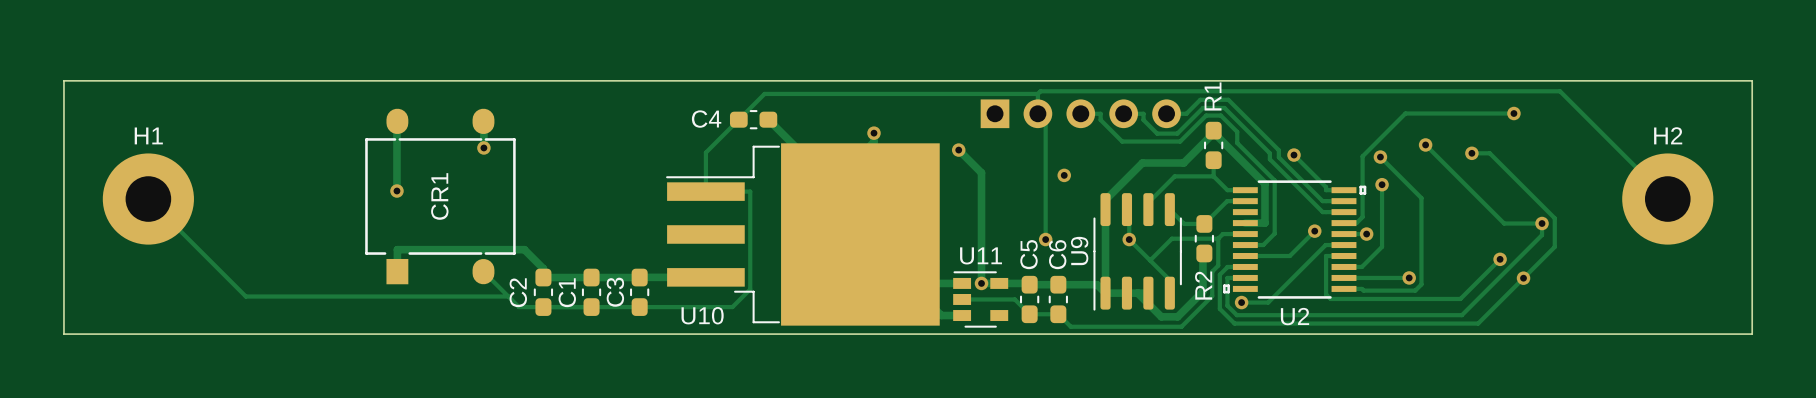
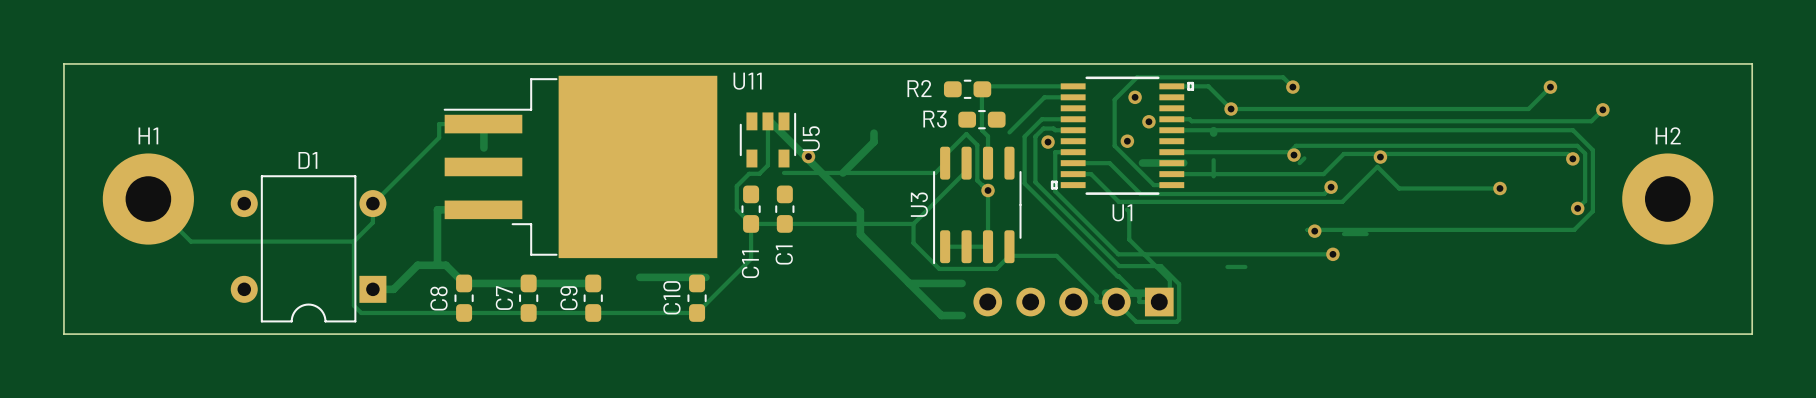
board edge: (63, 80) (1752, 80) -> (63, 80) (63, 63) (1752, 63) (1752, 80)
track: none -> (1073, 86) (985, 86) (981, 89) (981, 130) (988, 136) (988, 163)
track: none -> (1171, 86) (1208, 86) (1231, 109) (1528, 109) (1550, 87)
track: none -> (1292, 87) (1283, 77) (1137, 77) (1114, 99) (1114, 145) (1153, 185) (1171, 185)
via: none -> (1292, 87)
via: none -> (1550, 87)
track: (1037, 93) (1040, 91) (1560, 91) (1667, 199) -> none
track: (1037, 93) (764, 93) (705, 152) (705, 191) (750, 191) (750, 289) (732, 307) (518, 307) (483, 271) -> none
track: (1037, 93) (1037, 113) (1045, 121) (1045, 239) -> none
track: none -> (1073, 97) (1044, 97) (1009, 132)
via: none -> (1135, 97)
via: none -> (1231, 109)
track: none -> (1602, 109) (1591, 121) (1191, 121) (1189, 119) (1171, 119)
via: none -> (1602, 109)
track: (1080, 113) (1100, 113) (1100, 119) (1122, 141) (1180, 141) (1206, 115) (1220, 115) (1237, 131) (1237, 143) (1274, 180) (1274, 233) (1263, 245) (1245, 245) -> none
part rotation: 0° (1080, 113) -> 180° (1073, 302)
part position: (1080, 113) -> (1073, 302)
track: (1123, 113) (1143, 113) (1143, 119) (1157, 133) (1177, 133) (1203, 107) (1224, 107) (1269, 153) (1269, 159) (1322, 212) (1343, 212) -> none
track: (1166, 113) (1186, 113) (1200, 99) (1228, 99) (1278, 150) (1278, 157) (1322, 201) (1343, 201) -> none
track: (1513, 113) (1405, 113) (1362, 156) (1362, 217) (1356, 223) (1343, 223) -> none
via: (1513, 113) -> none
C4: (753, 119) -> none
R3: none -> (981, 119)
track: none -> (1073, 119) (1041, 119) (1024, 136) (1024, 183) (1139, 296) (1139, 302) (1159, 302)
track: (397, 121) (396, 191) -> none
track: none -> (767, 121) (767, 165) (759, 173) (749, 173) (736, 186) (736, 209) (751, 223)
via: none -> (1148, 121)
track: none -> (483, 124) (439, 124) (439, 137) (372, 203)
track: none -> (1073, 130) (1043, 128) (1035, 136) (1035, 182) (1119, 266) (1161, 266) (1179, 284) (1179, 319) (1176, 321) (1136, 321) (1116, 302) (1096, 302) (1096, 295) (1056, 255) (1009, 255)
track: none -> (1171, 130) (1572, 130) (1592, 150) (1592, 211) (1574, 229) (1307, 229)
via: (874, 133) -> none
U1: none -> (1122, 135)
U5: none -> (767, 139)
via: none -> (1127, 141)
via: none -> (1048, 142)
track: (1425, 144) (1504, 223) (1542, 223) (1542, 235) (1461, 315) (1236, 315) (1227, 305) (1227, 277) (1245, 277) -> none
via: (1425, 144) -> none
R1: (1213, 145) -> none
via: (483, 147) -> none
track: (958, 150) (981, 172) (981, 283) (1097, 284) (1105, 293) (1105, 199) (1142, 163) -> none
via: (958, 150) -> none
track: none -> (1073, 152) (1055, 152) (1055, 191) (1118, 254) (1332, 254)
track: none -> (1171, 152) (1289, 152) (1296, 145) (1577, 145) (1585, 153) (1585, 200) (1577, 208)
track: (1471, 153) (1489, 153) (1554, 218) (1554, 246) (1478, 323) (1234, 323) (1219, 308) (1219, 274) (1227, 267) -> none
via: (1471, 153) -> none
track: (1294, 155) (1326, 187) (1326, 190) (1343, 190) -> none
via: none -> (808, 156)
track: (1380, 157) (1421, 198) (1421, 284) (1415, 290) (1343, 288) -> none
track: none -> (1304, 158) (1299, 163)
track: none -> (1572, 158) (1567, 153) (1343, 153) (1323, 174) (1171, 174)
via: none -> (1572, 158)
track: none -> (966, 163) (966, 170) (913, 223)
track: none -> (1073, 163) (1109, 163) (1140, 194) (1324, 194) (1331, 187)
track: (1183, 163) (1214, 133) (1264, 183) (1264, 223) (1245, 223) -> none
track: none -> (784, 172) (935, 172) (945, 163) (945, 155) (966, 134) (977, 145) (977, 180) (988, 190) (988, 246) (945, 246)
track: none -> (1073, 174) (1091, 174) (1118, 201) (1342, 201) (1377, 166) (1399, 188) (1499, 188)
via: (1064, 175) -> none
track: (1382, 184) (1382, 246) (1361, 266) (1343, 266) -> none
via: (1382, 184) -> none
via: none -> (1331, 187)
via: none -> (1499, 188)
via: none -> (988, 190)
track: (1245, 190) (1227, 190) (1213, 176) (1174, 176) (1148, 202) (1148, 209) -> none
via: (396, 191) -> none
CR1: (440, 196) -> none
track: (1245, 201) (1227, 201) (1204, 223) (1184, 223) (1169, 209) -> none
track: none -> (372, 203) (372, 222) (353, 241)
U3: none -> (977, 205)
via: none -> (1577, 208)
track: none -> (483, 209) (437, 209) (437, 265)
C11: none -> (751, 209)
track: none -> (751, 223) (751, 258) (697, 312) (361, 312) (353, 305) (353, 241)
track: none -> (751, 223) (913, 223)
track: none -> (913, 223) (913, 243) (939, 268) (996, 268) (1009, 255)
via: (1542, 223) -> none
track: (1314, 231) (1289, 256) (1245, 256) -> none
U10: (802, 234) -> none
track: (1245, 234) (1222, 234) (1218, 238) -> none
via: (1366, 234) -> none
R2 rotation: 0° (1204, 238) -> 90° clockwise (967, 89)
R2 position: (1204, 238) -> (967, 89)
track: (1218, 238) (1218, 265) (1212, 271) (1212, 296) (1181, 326) (1070, 326) (1058, 314) (1029, 314) (1014, 299) (962, 299) -> none
track: (1218, 238) (1171, 238) (1150, 260) -> none
via: (1045, 239) -> none
via: (1129, 239) -> none
U2: (1294, 239) -> none
track: (190, 241) (245, 296) (508, 296) -> (190, 241) (353, 241)
track: (1343, 245) (1325, 245) (1268, 302) (1241, 302) -> none
D1: none -> (308, 248)
U9: (1137, 251) -> none
track: (1204, 253) (1202, 291) (1177, 316) (1161, 316) (1137, 293) -> none
via: none -> (1332, 254)
U11 name position: U11 (981, 255) -> U11 (747, 81)
track: (1343, 256) (1326, 256) (1326, 294) (1330, 298) (1460, 298) (1500, 259) -> none
via: (1500, 259) -> none
track: (397, 271) (397, 249) (524, 249) (543, 268) (543, 277) (639, 277) -> none
U11 footprint: [953, 271, 1009, 328] -> [443, 75, 718, 259]
track: (1343, 277) (1409, 277) -> none
via: (1409, 277) -> none
via: (1523, 278) -> none
track: none -> (593, 283) (464, 283) (445, 265) (417, 265) (393, 289) (372, 289)
via: (981, 283) -> none
C2 name: C2 (518, 292) -> C7 (504, 298)
C2 position: (543, 292) -> (528, 298)
C1 name position: C1 (567, 292) -> C1 (784, 254)
C1 position: (591, 292) -> (784, 209)
C3: (639, 292) -> none
C8: none -> (464, 298)
C9: none -> (593, 298)
C10: none -> (697, 298)
C5: (1029, 299) -> none
C6: (1058, 299) -> none
via: (1241, 302) -> none

